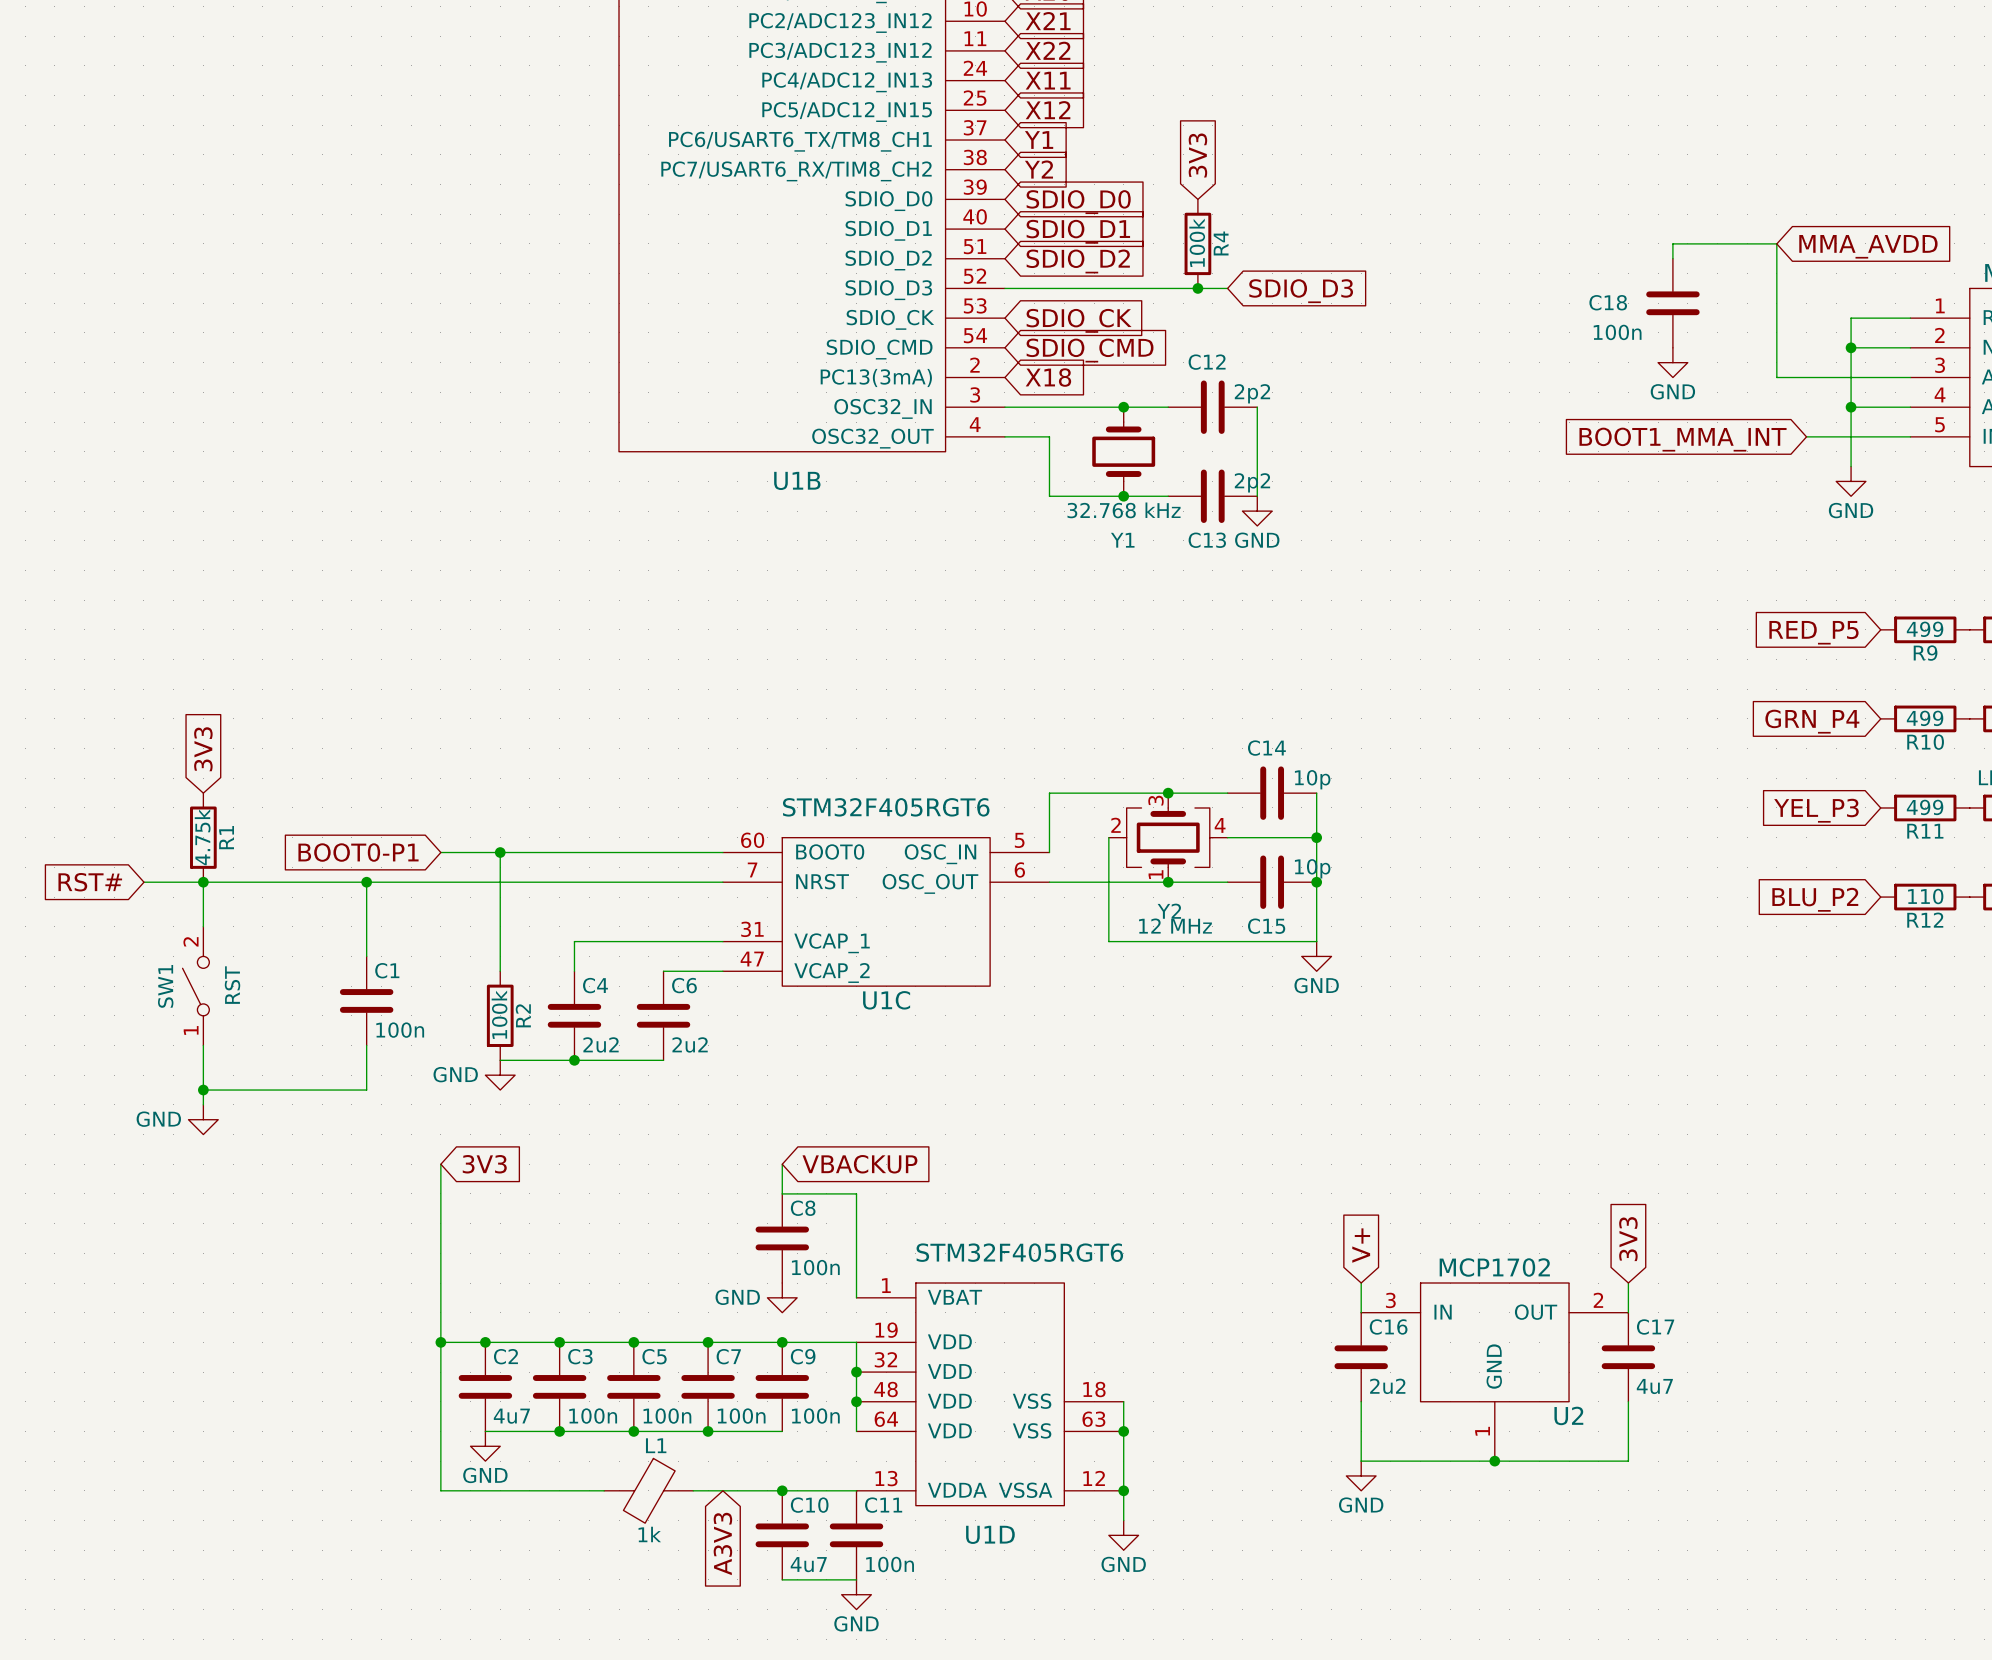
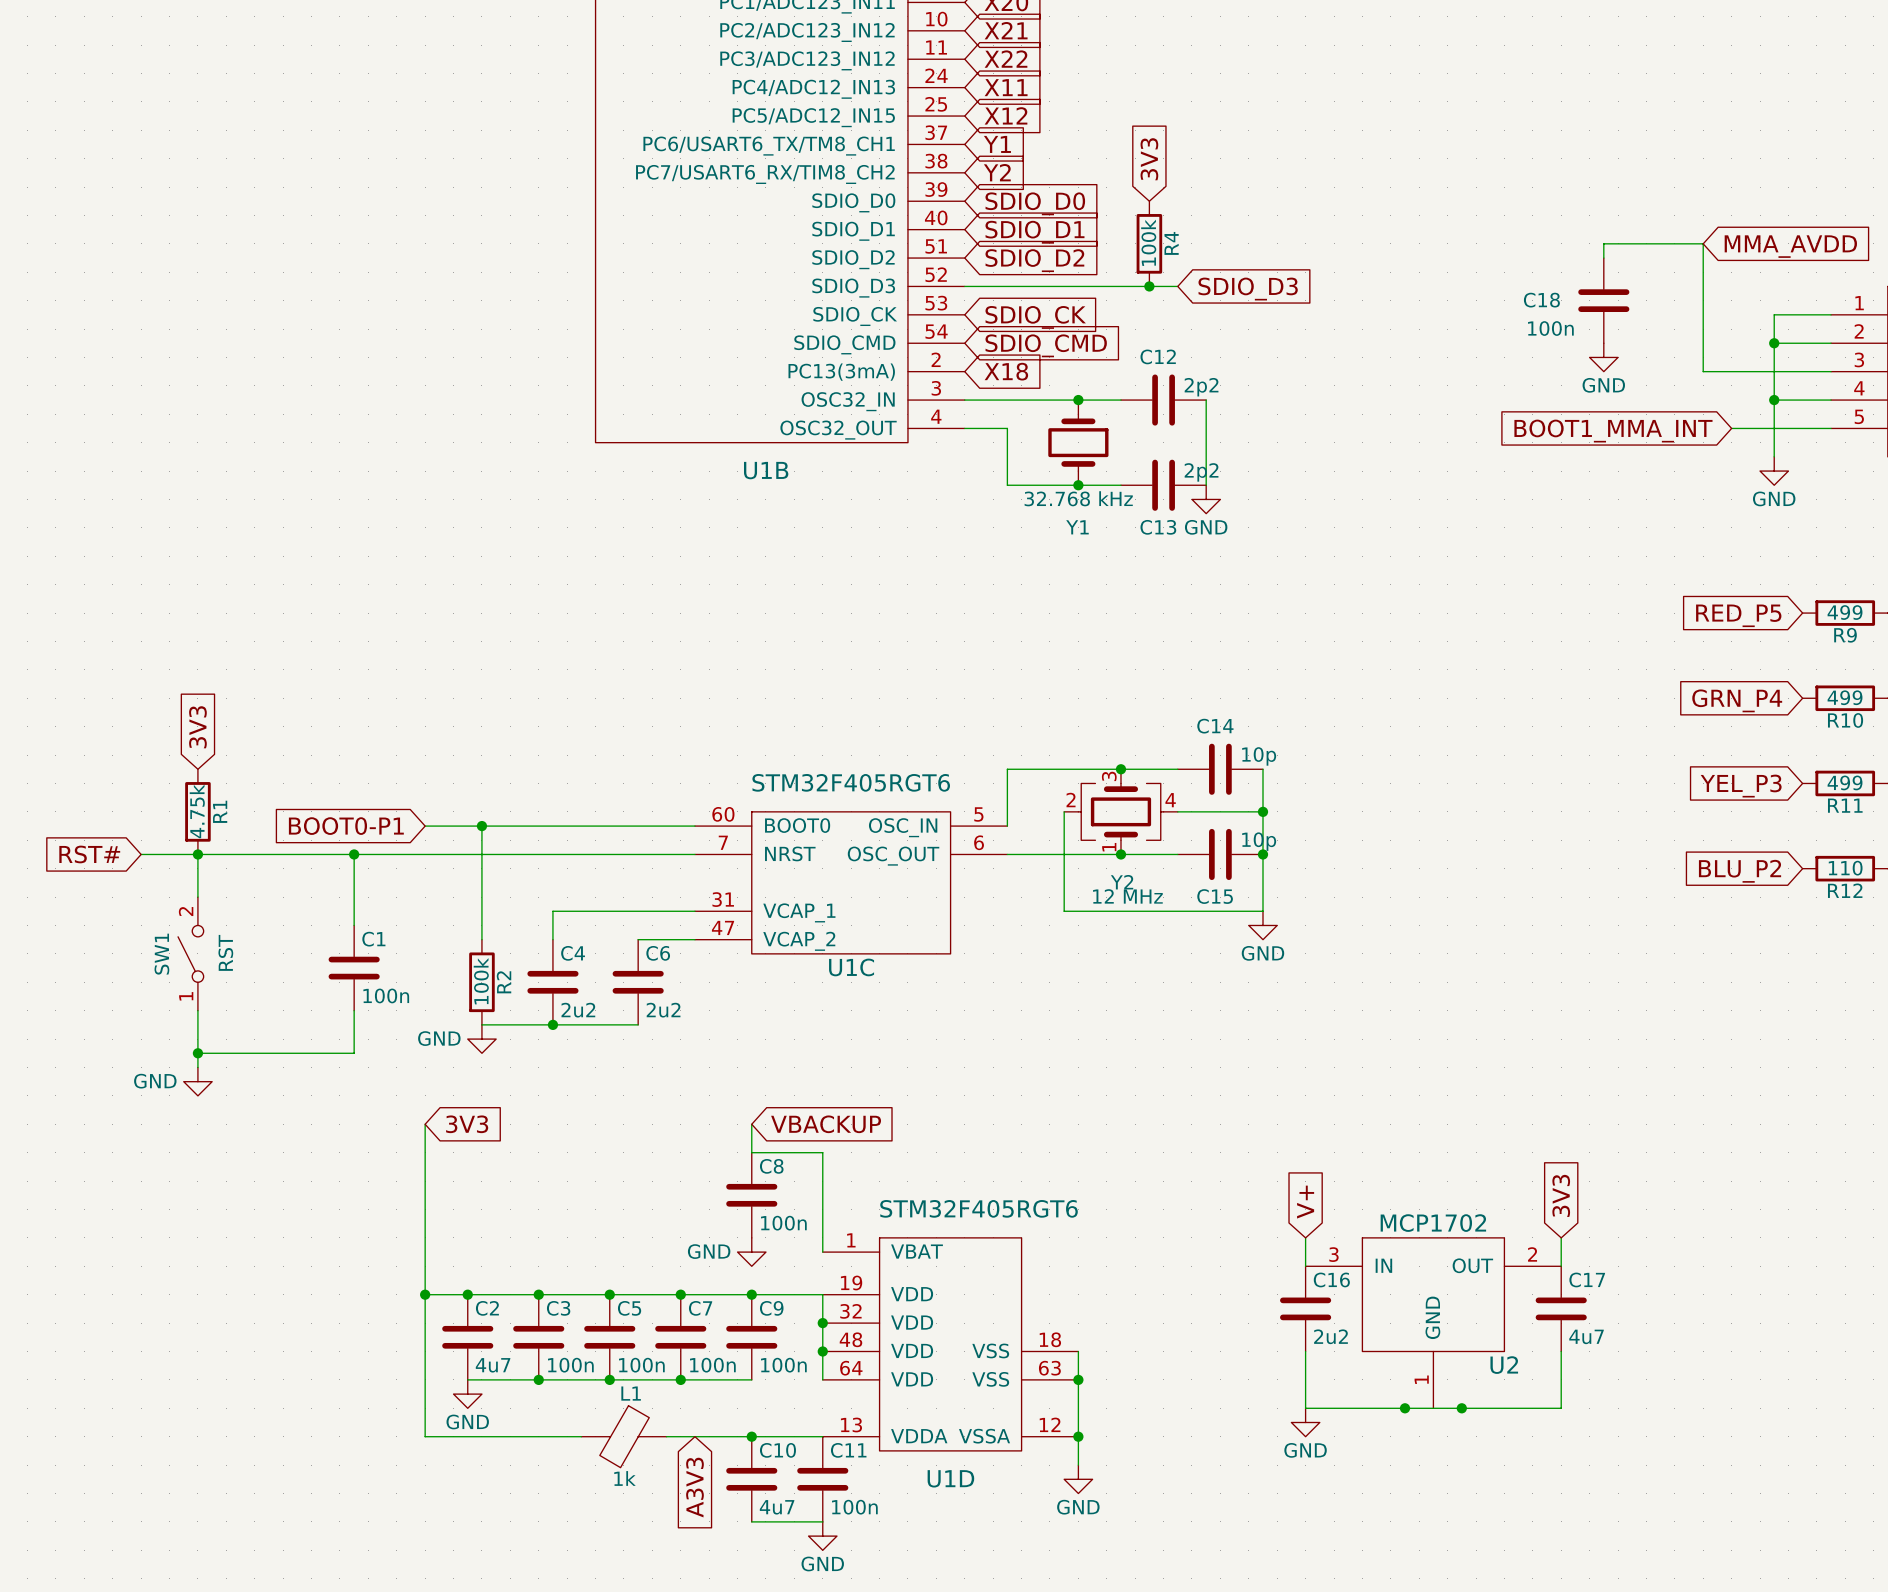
junction: none -> (1405, 1408)
junction: (1494, 1461) -> none
junction: none -> (1461, 1408)

